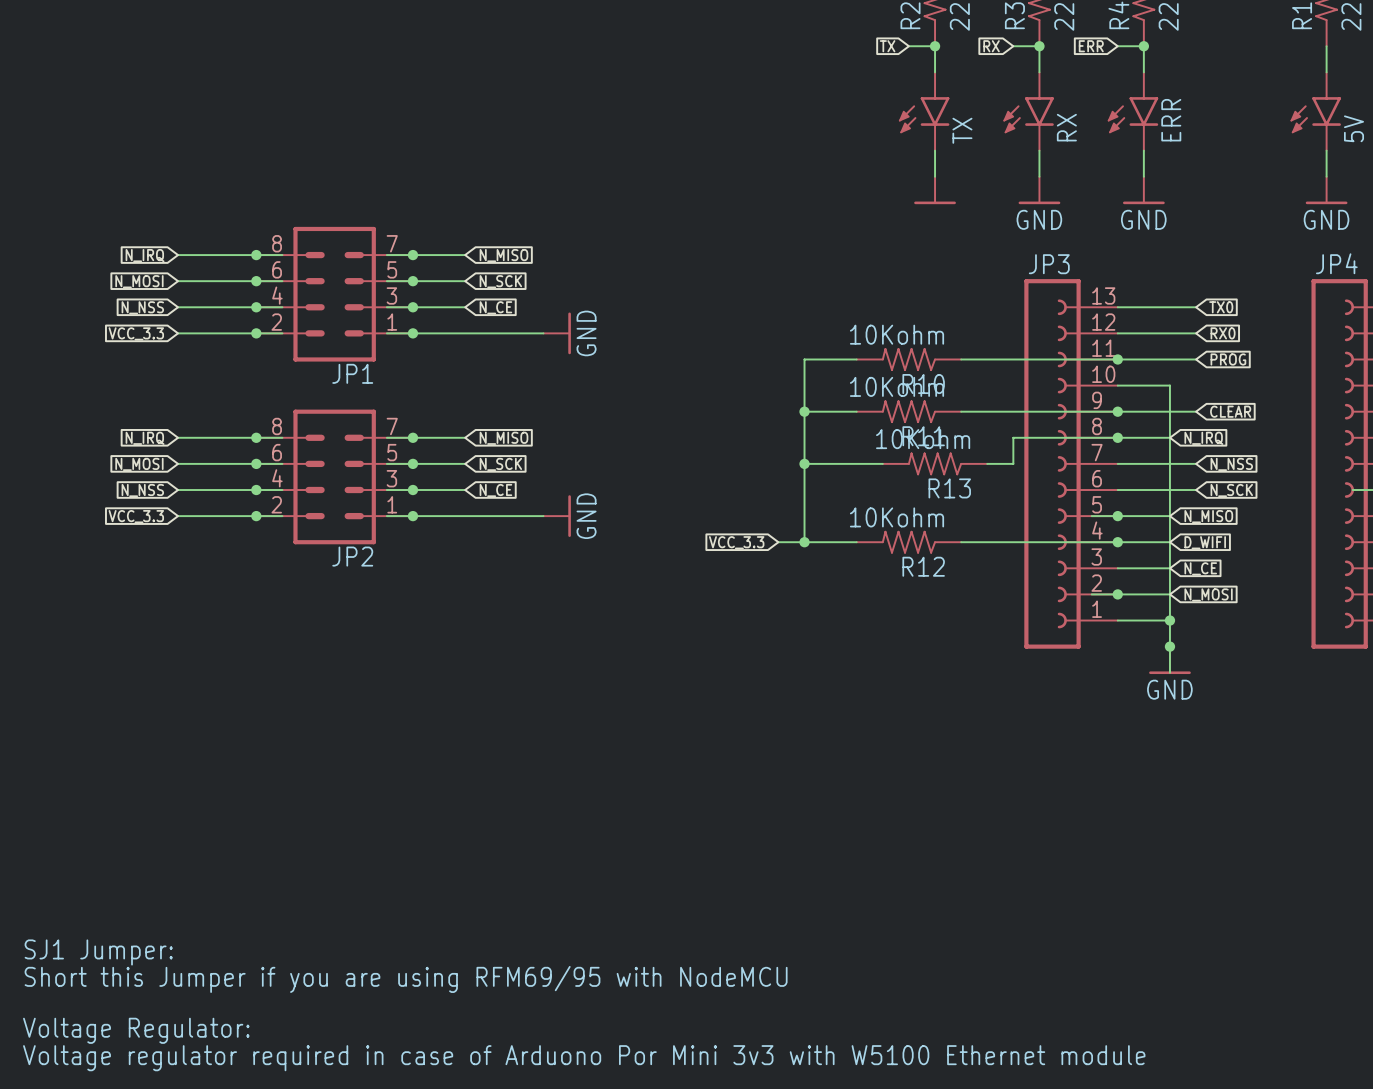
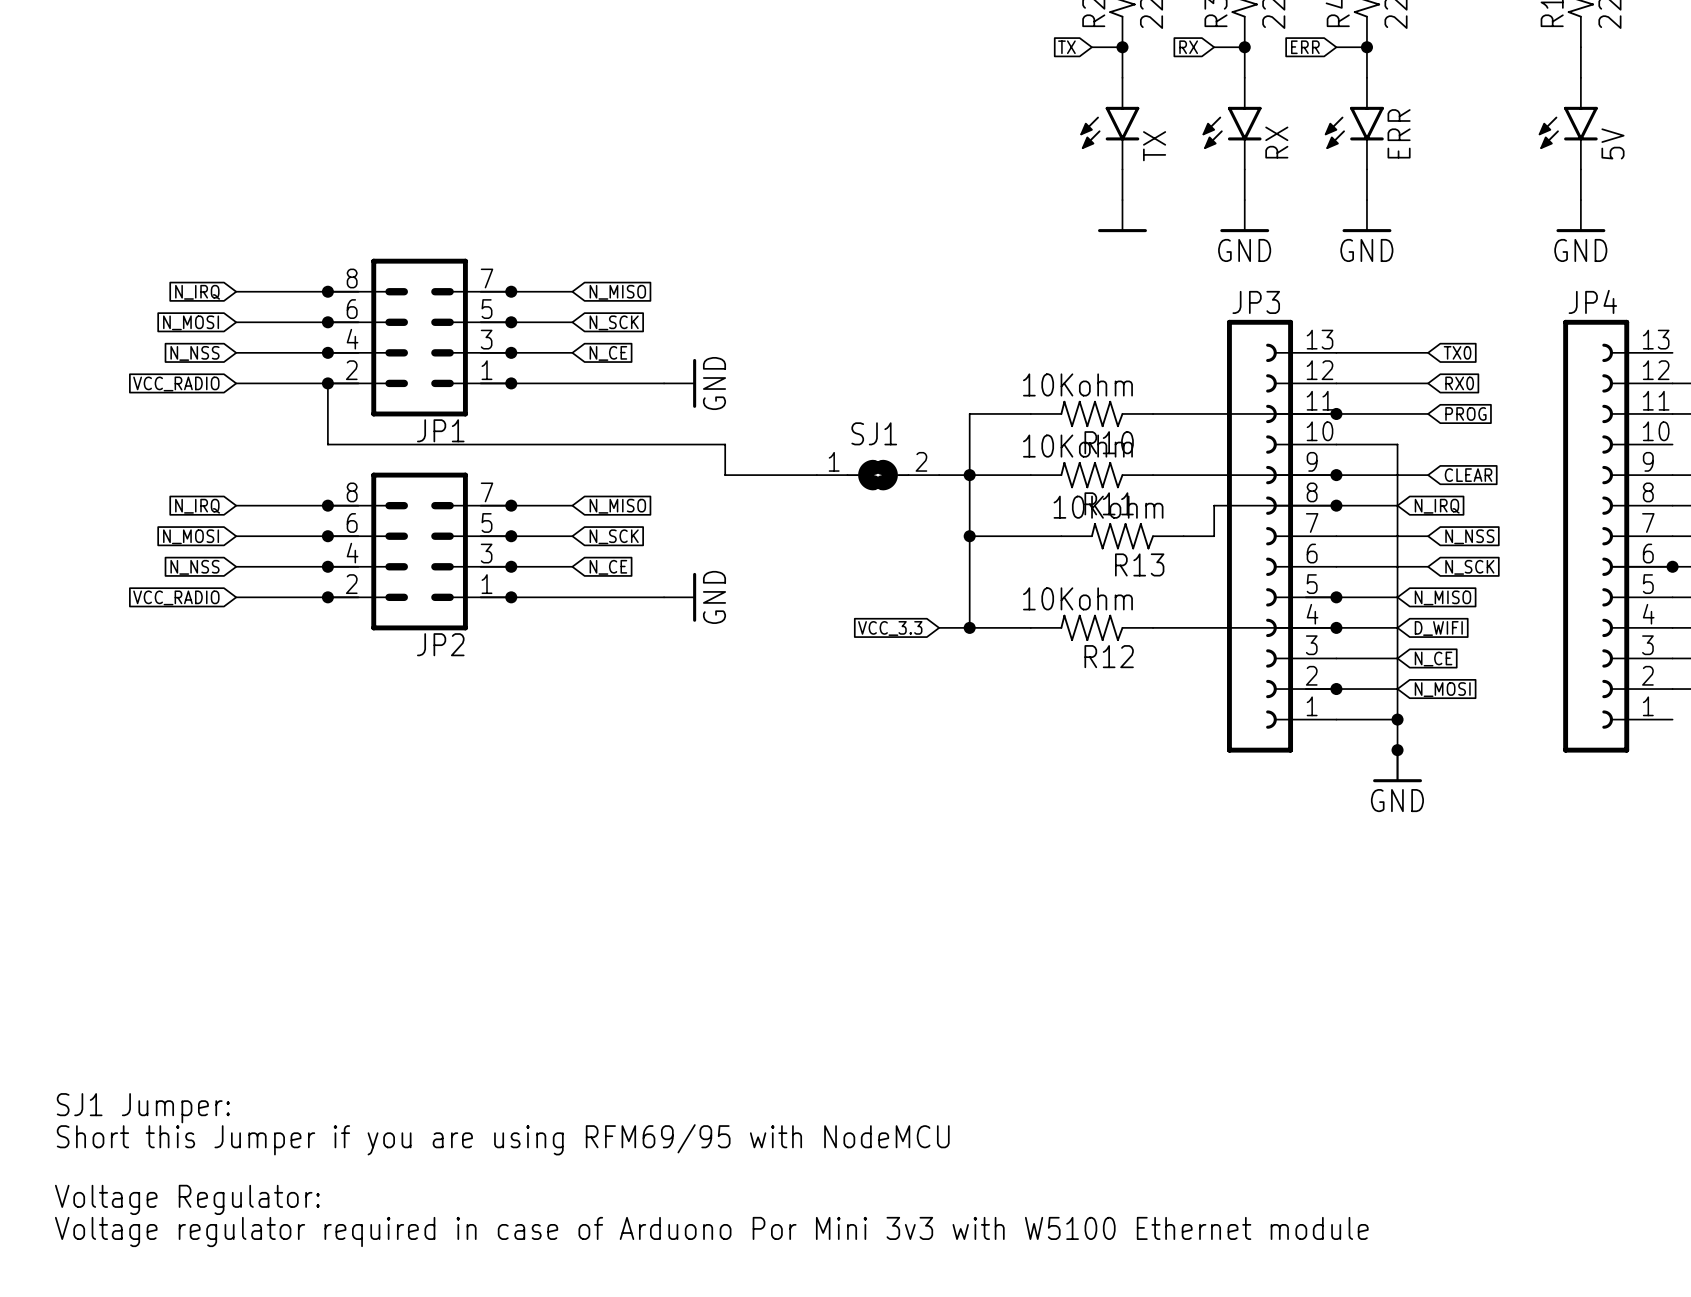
global label: VCC_3.3 (136, 333) -> VCC_RADIO (176, 383)
wire: none -> (327, 383) (327, 444) (725, 444) (725, 475) (816, 475)
SJ1: none -> (878, 475)
wire: none -> (939, 475) (969, 475)
global label: VCC_3.3 (136, 516) -> VCC_RADIO (176, 597)

